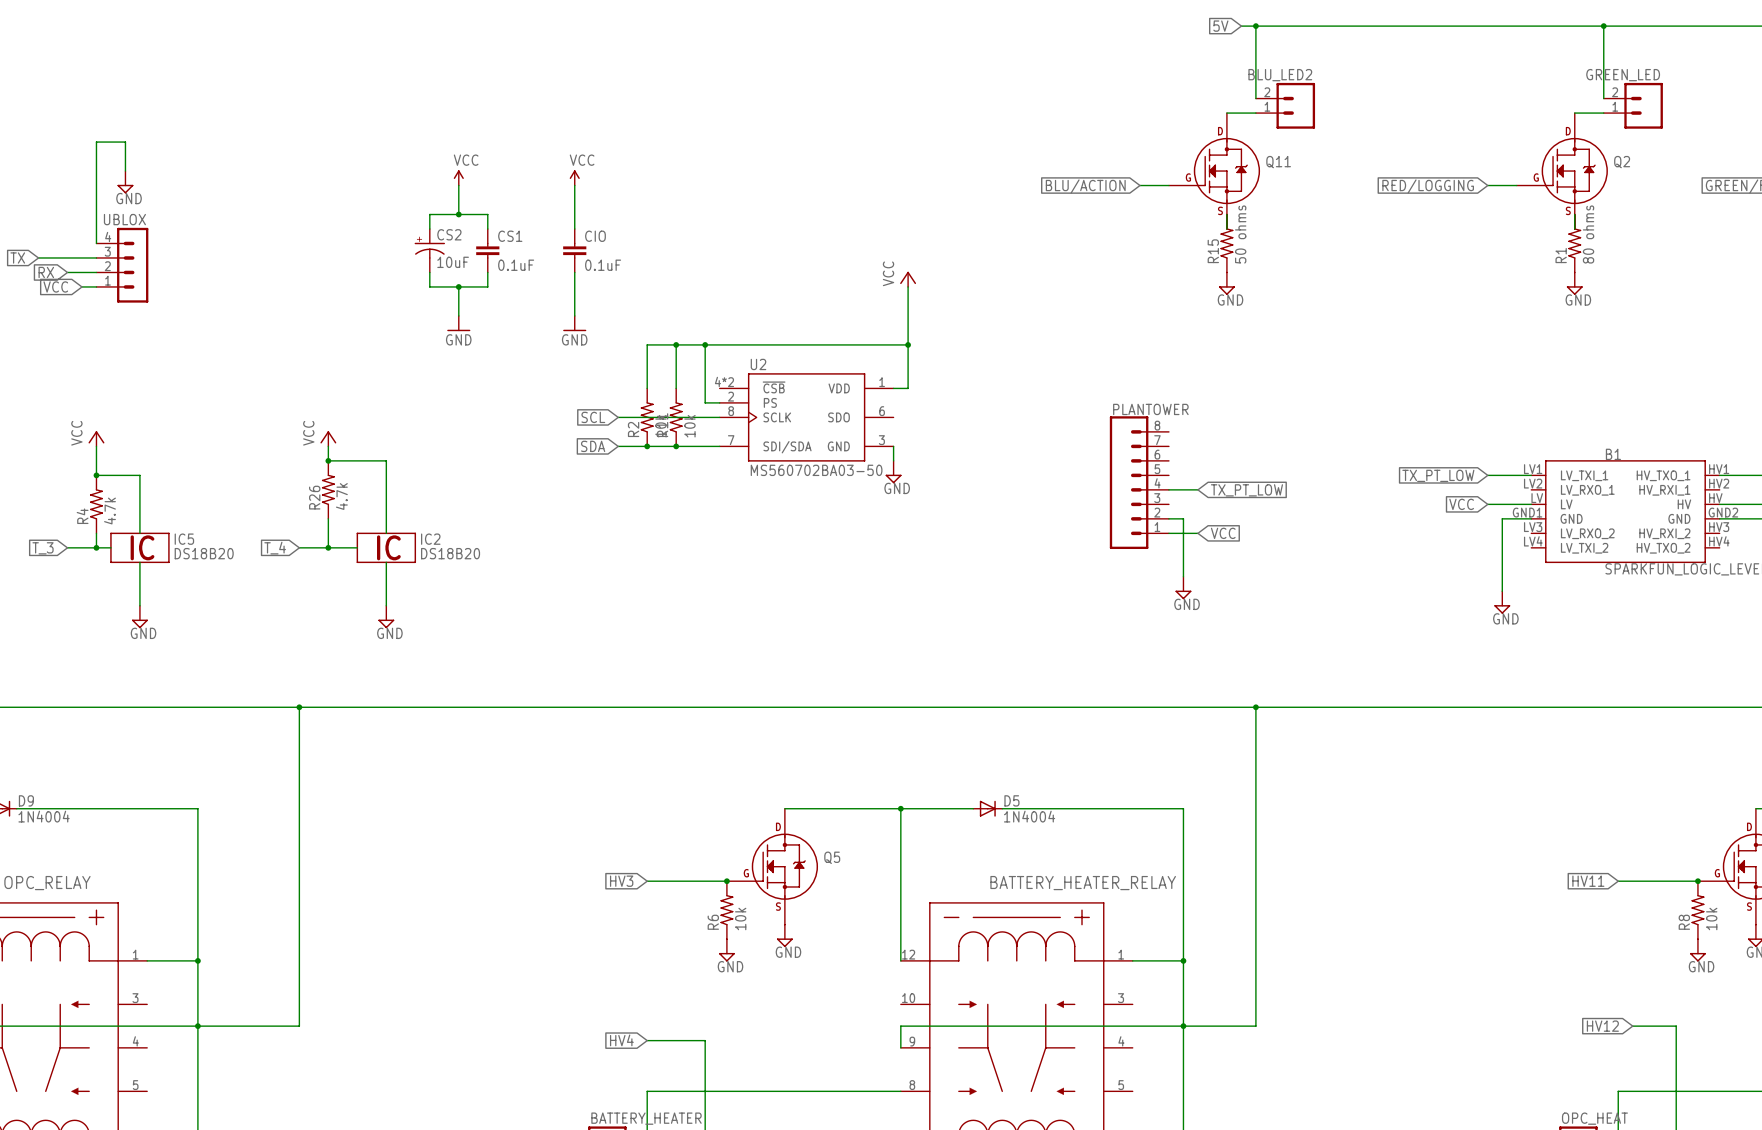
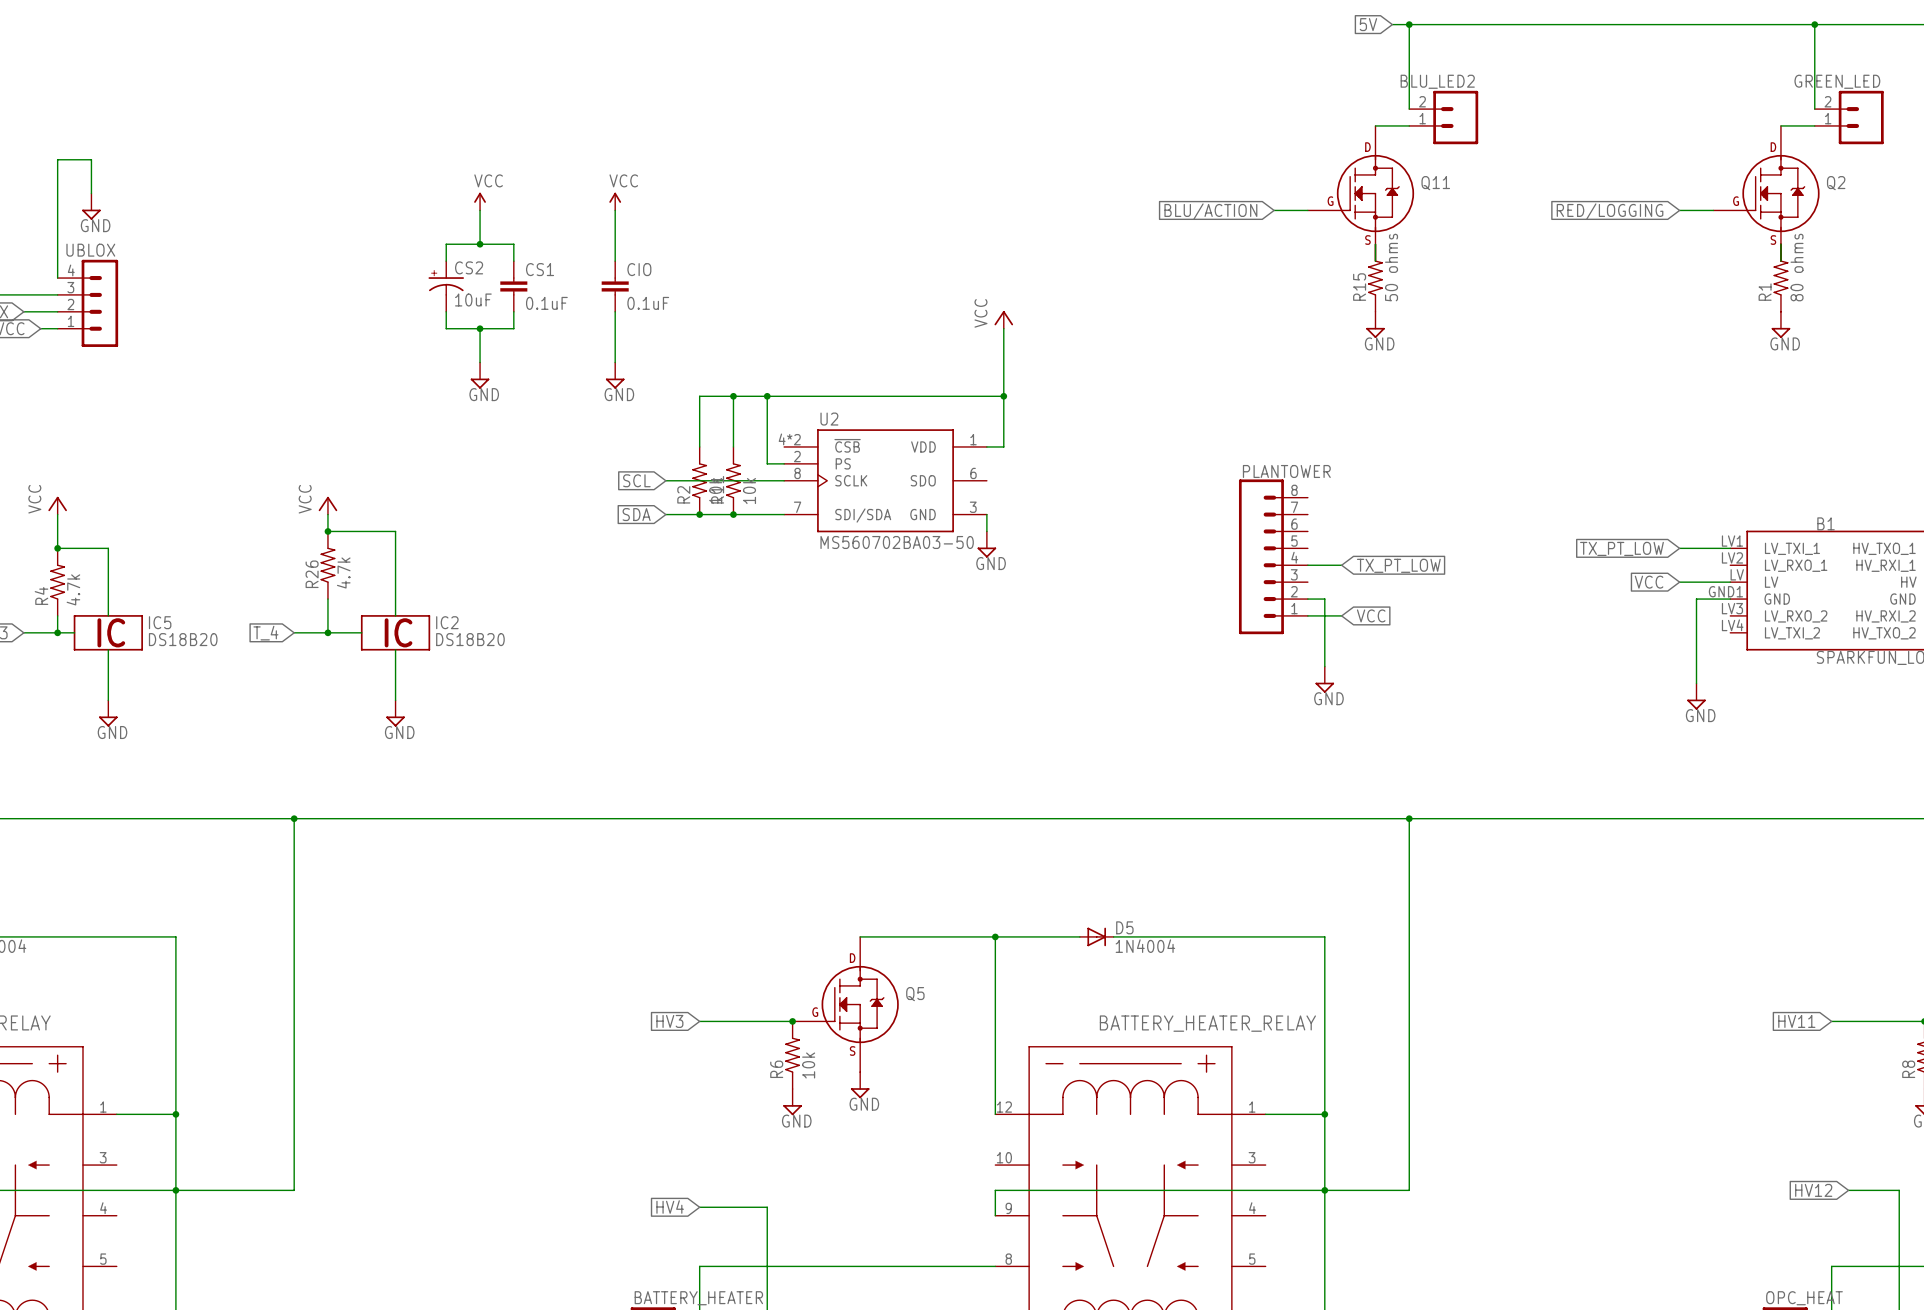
power symbol shape: [447, 315, 471, 332] -> [470, 362, 490, 389]
power symbol shape: [563, 315, 587, 332] -> [605, 362, 625, 389]

